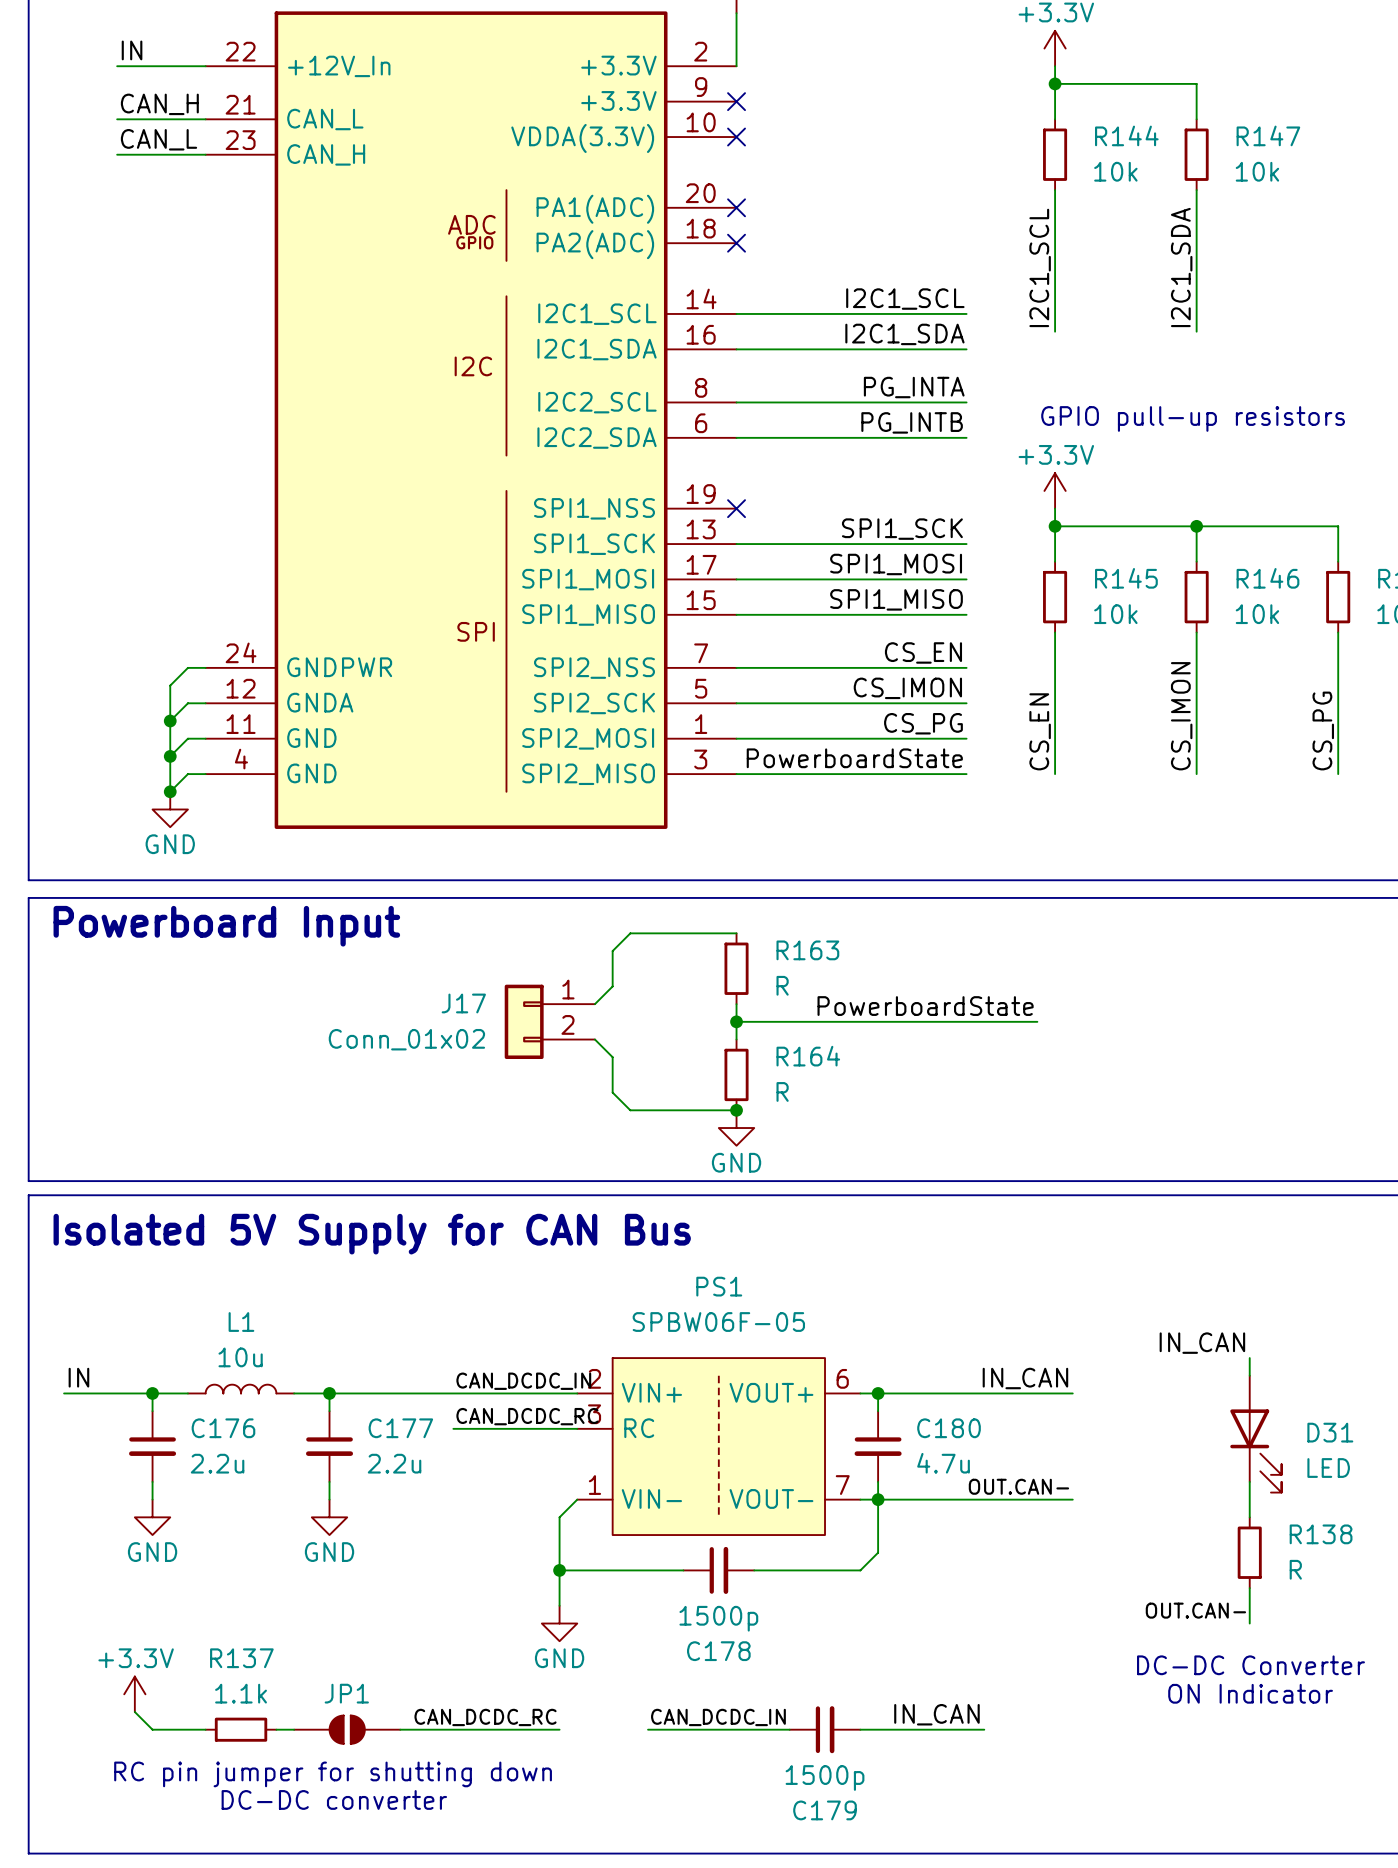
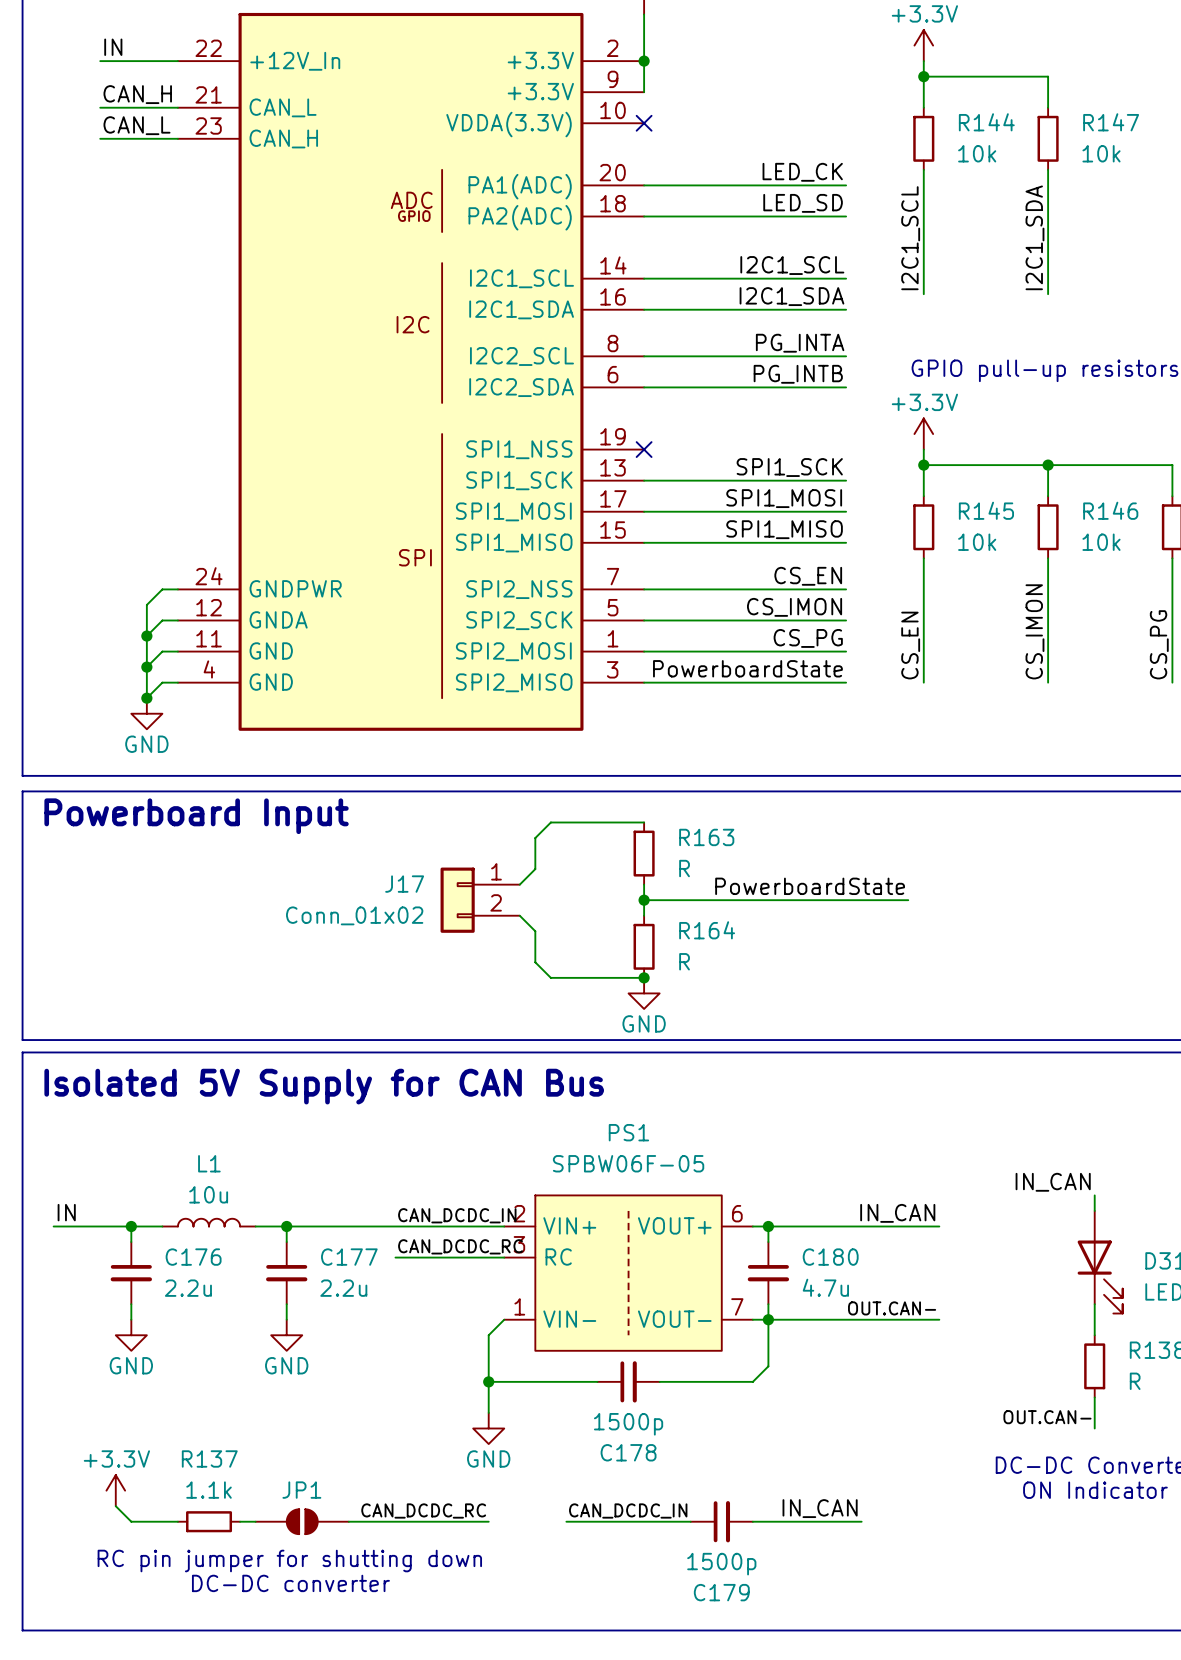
wire: none -> (644, 61) (644, 92)
junction: none -> (644, 61)
no-connect mark: (736, 101) -> none
label: none -> LED_CK (802, 172)
wire: none -> (644, 185) (846, 185)
no-connect mark: (736, 207) -> none
label: none -> LED_SD (803, 203)
wire: none -> (644, 216) (846, 216)
no-connect mark: (736, 243) -> none

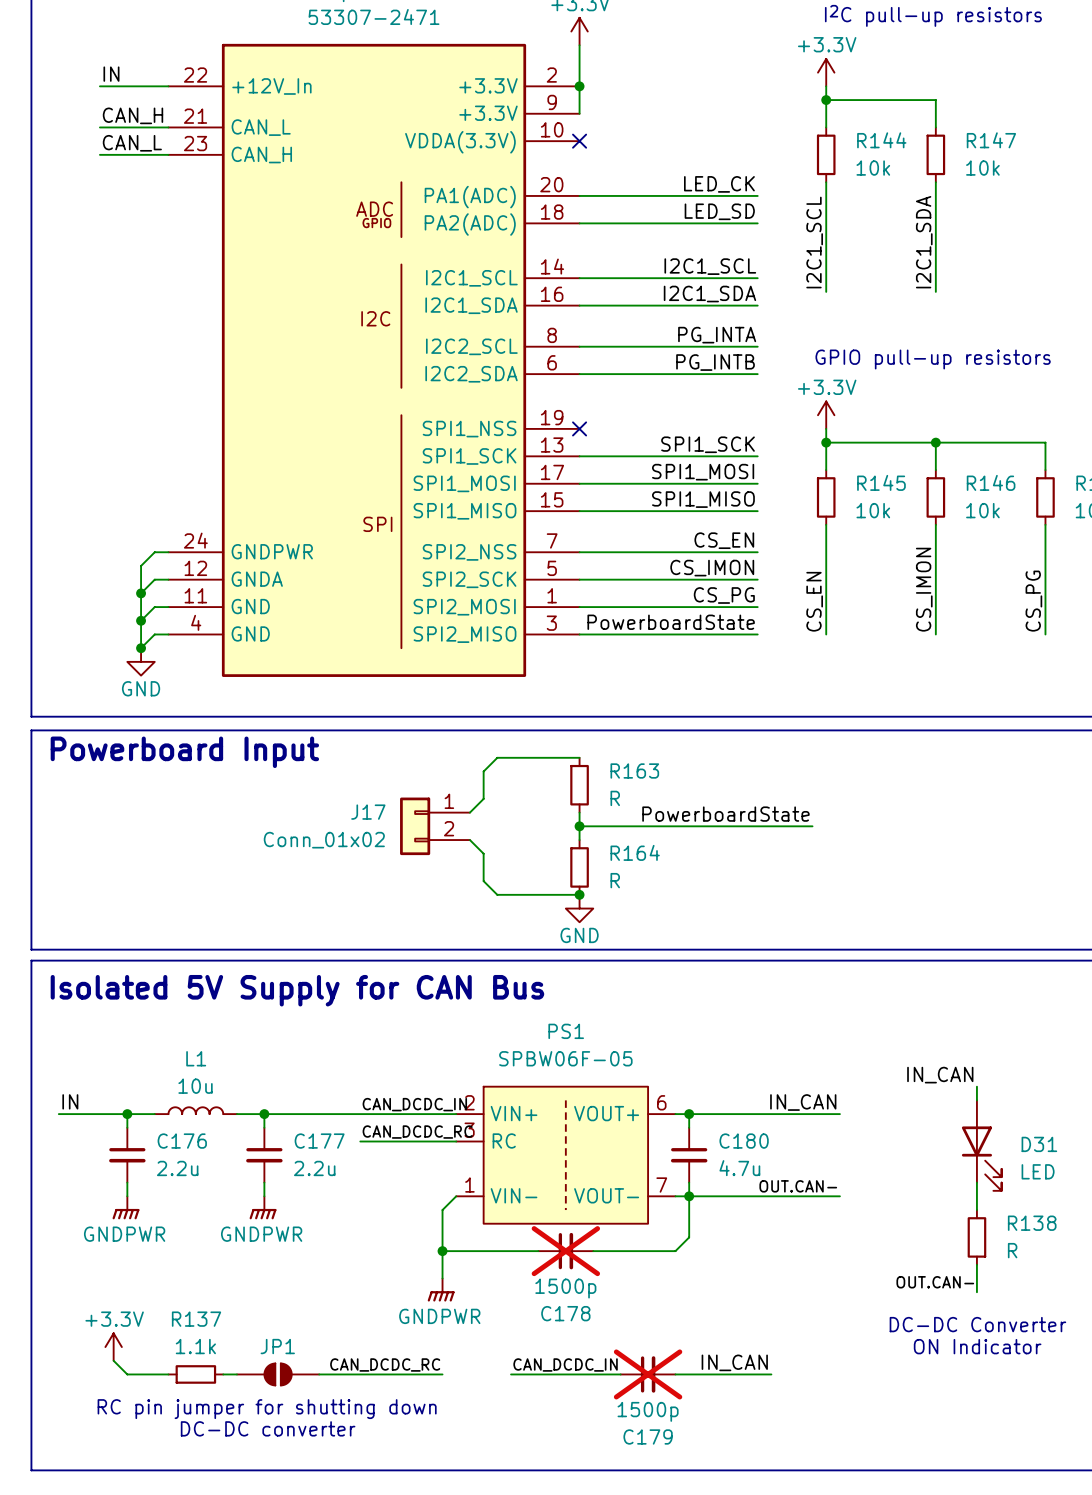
power symbol: GND (131, 1335) -> GNDPWR (125, 1207)
power symbol: GND (286, 1335) -> GNDPWR (263, 1207)
C178 do-not-place cross: none -> (565, 1251)
power symbol: GND (488, 1428) -> GNDPWR (441, 1290)
C179 do-not-place cross: none -> (648, 1374)

